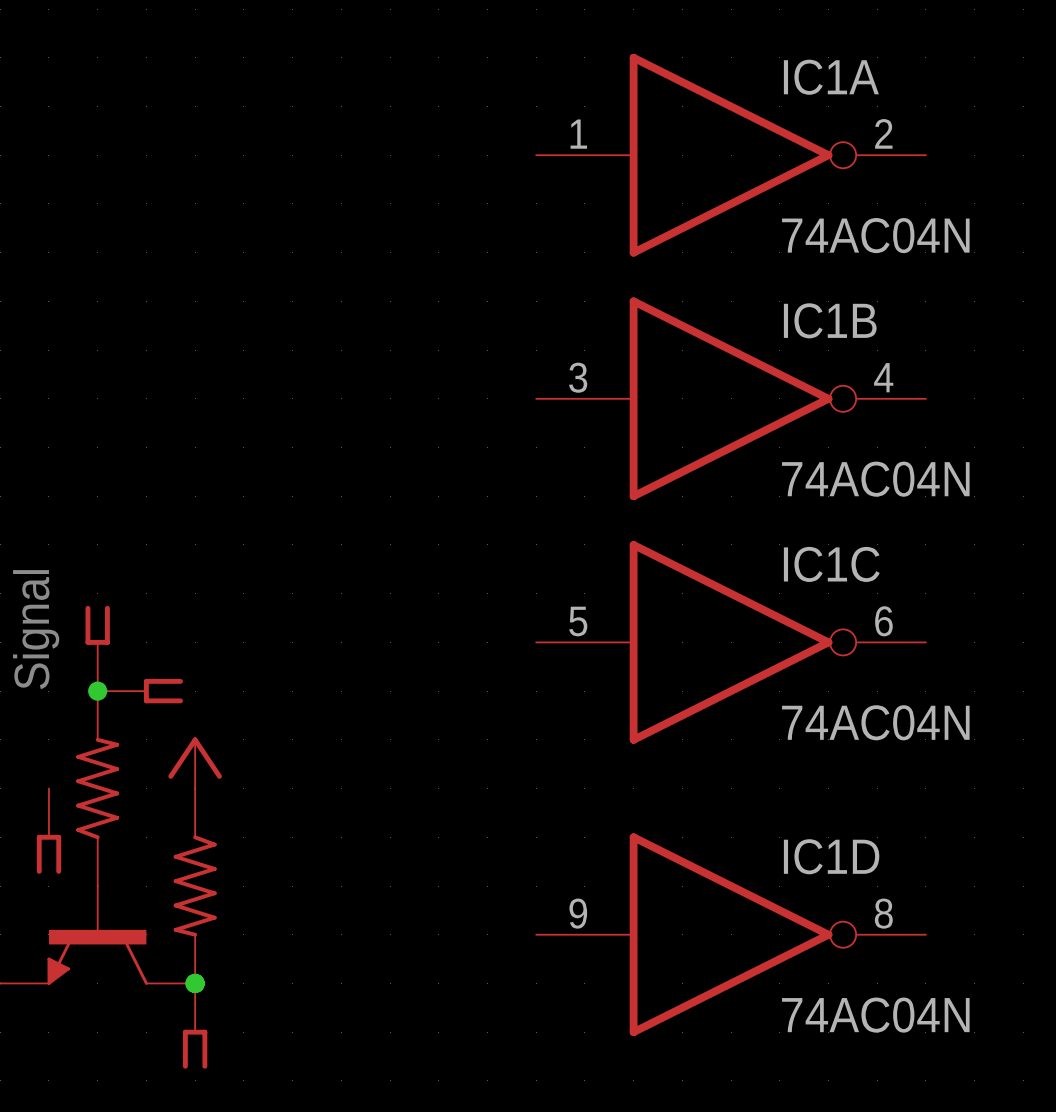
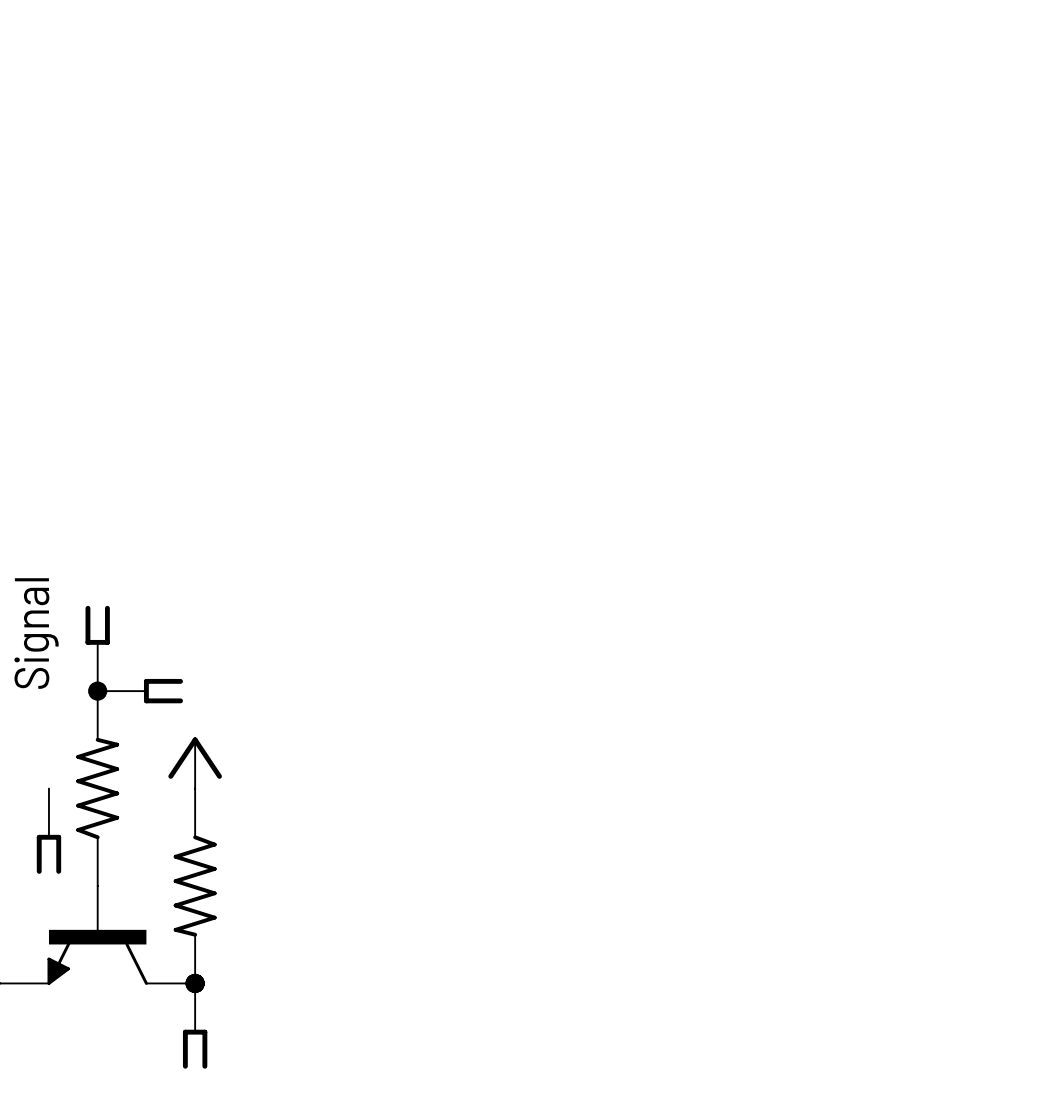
IC1A: 74AC04N (731, 155) -> none
IC1B: 74AC04N (731, 398) -> none
IC1C: 74AC04N (731, 642) -> none
IC1D: 74AC04N (731, 934) -> none

